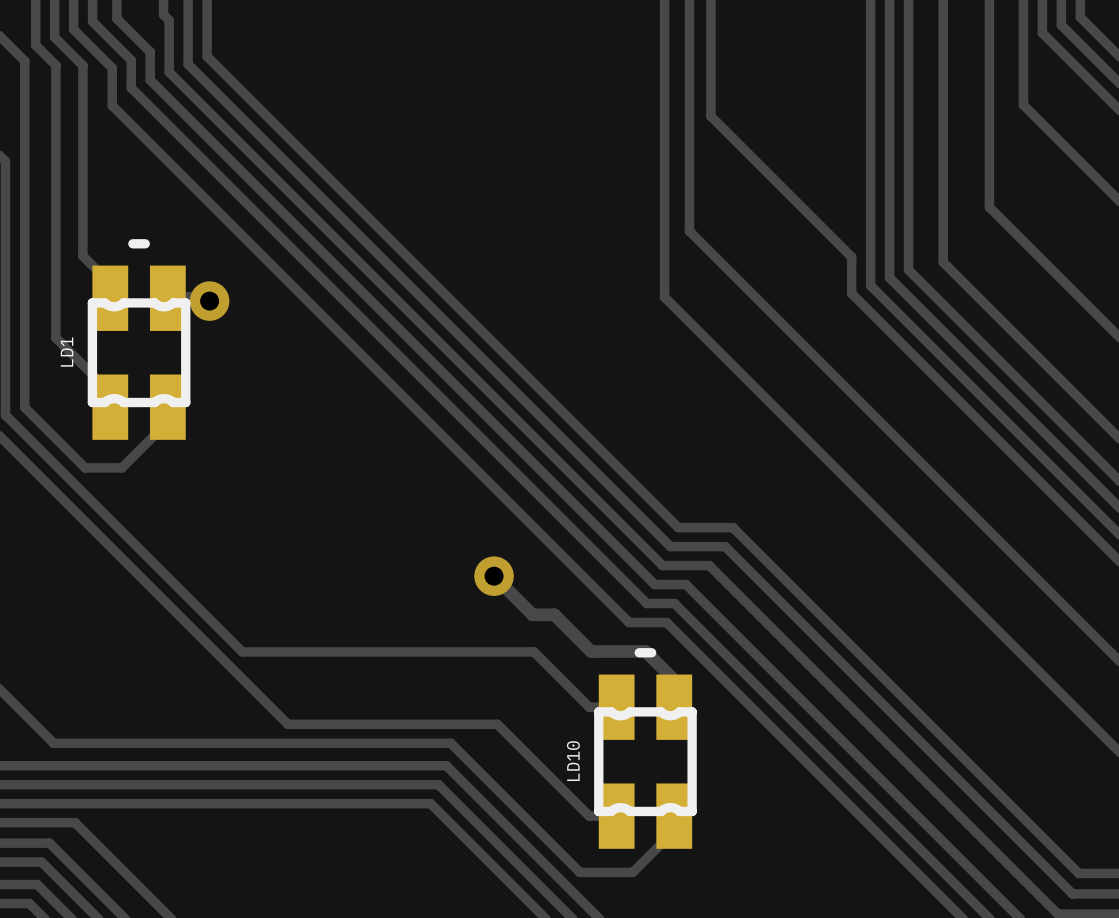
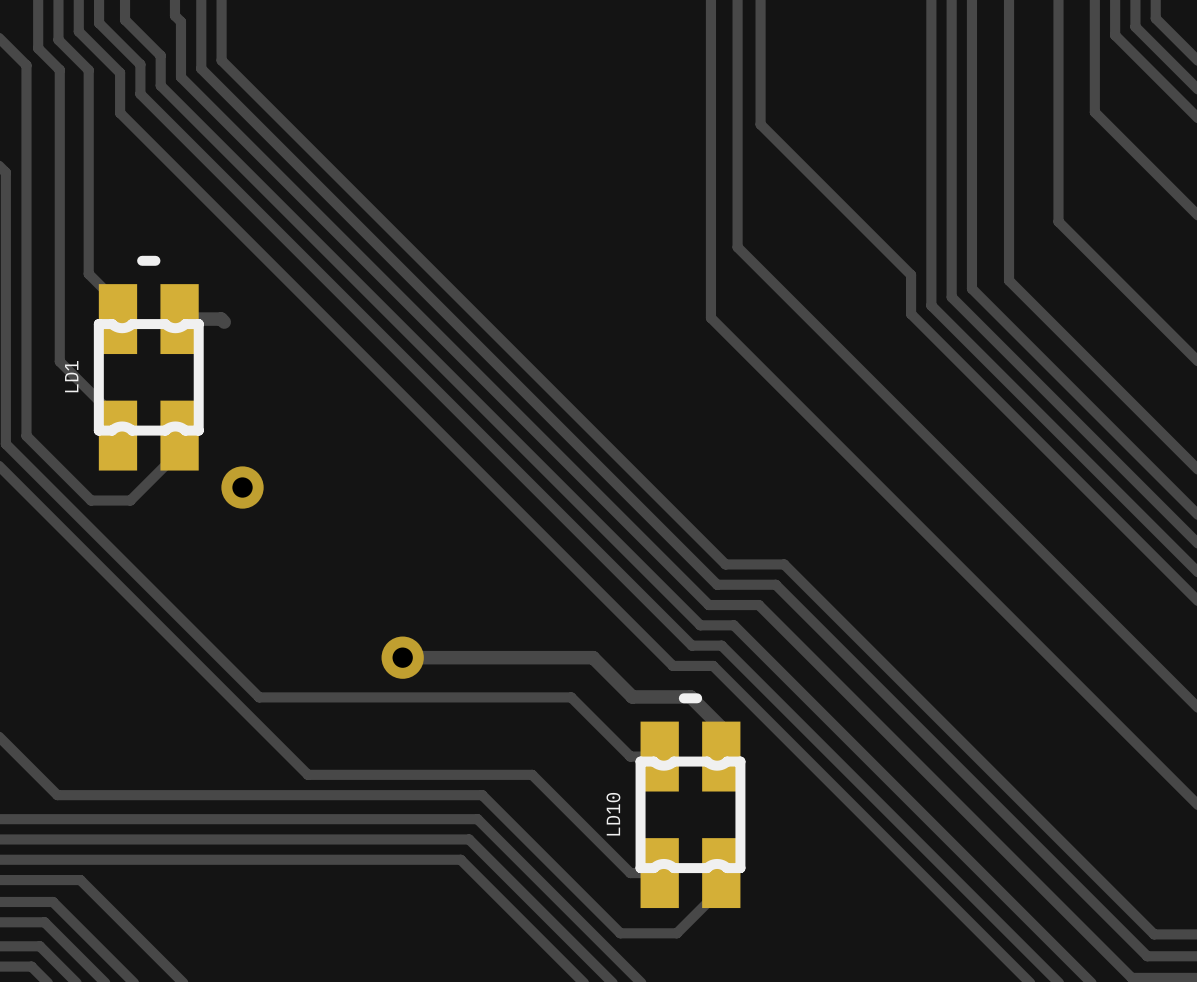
via: (209, 301) -> none
via: none -> (242, 487)
track: (494, 576) (532, 614) -> (402, 657) (569, 657)
via position: (494, 576) -> (402, 657)

